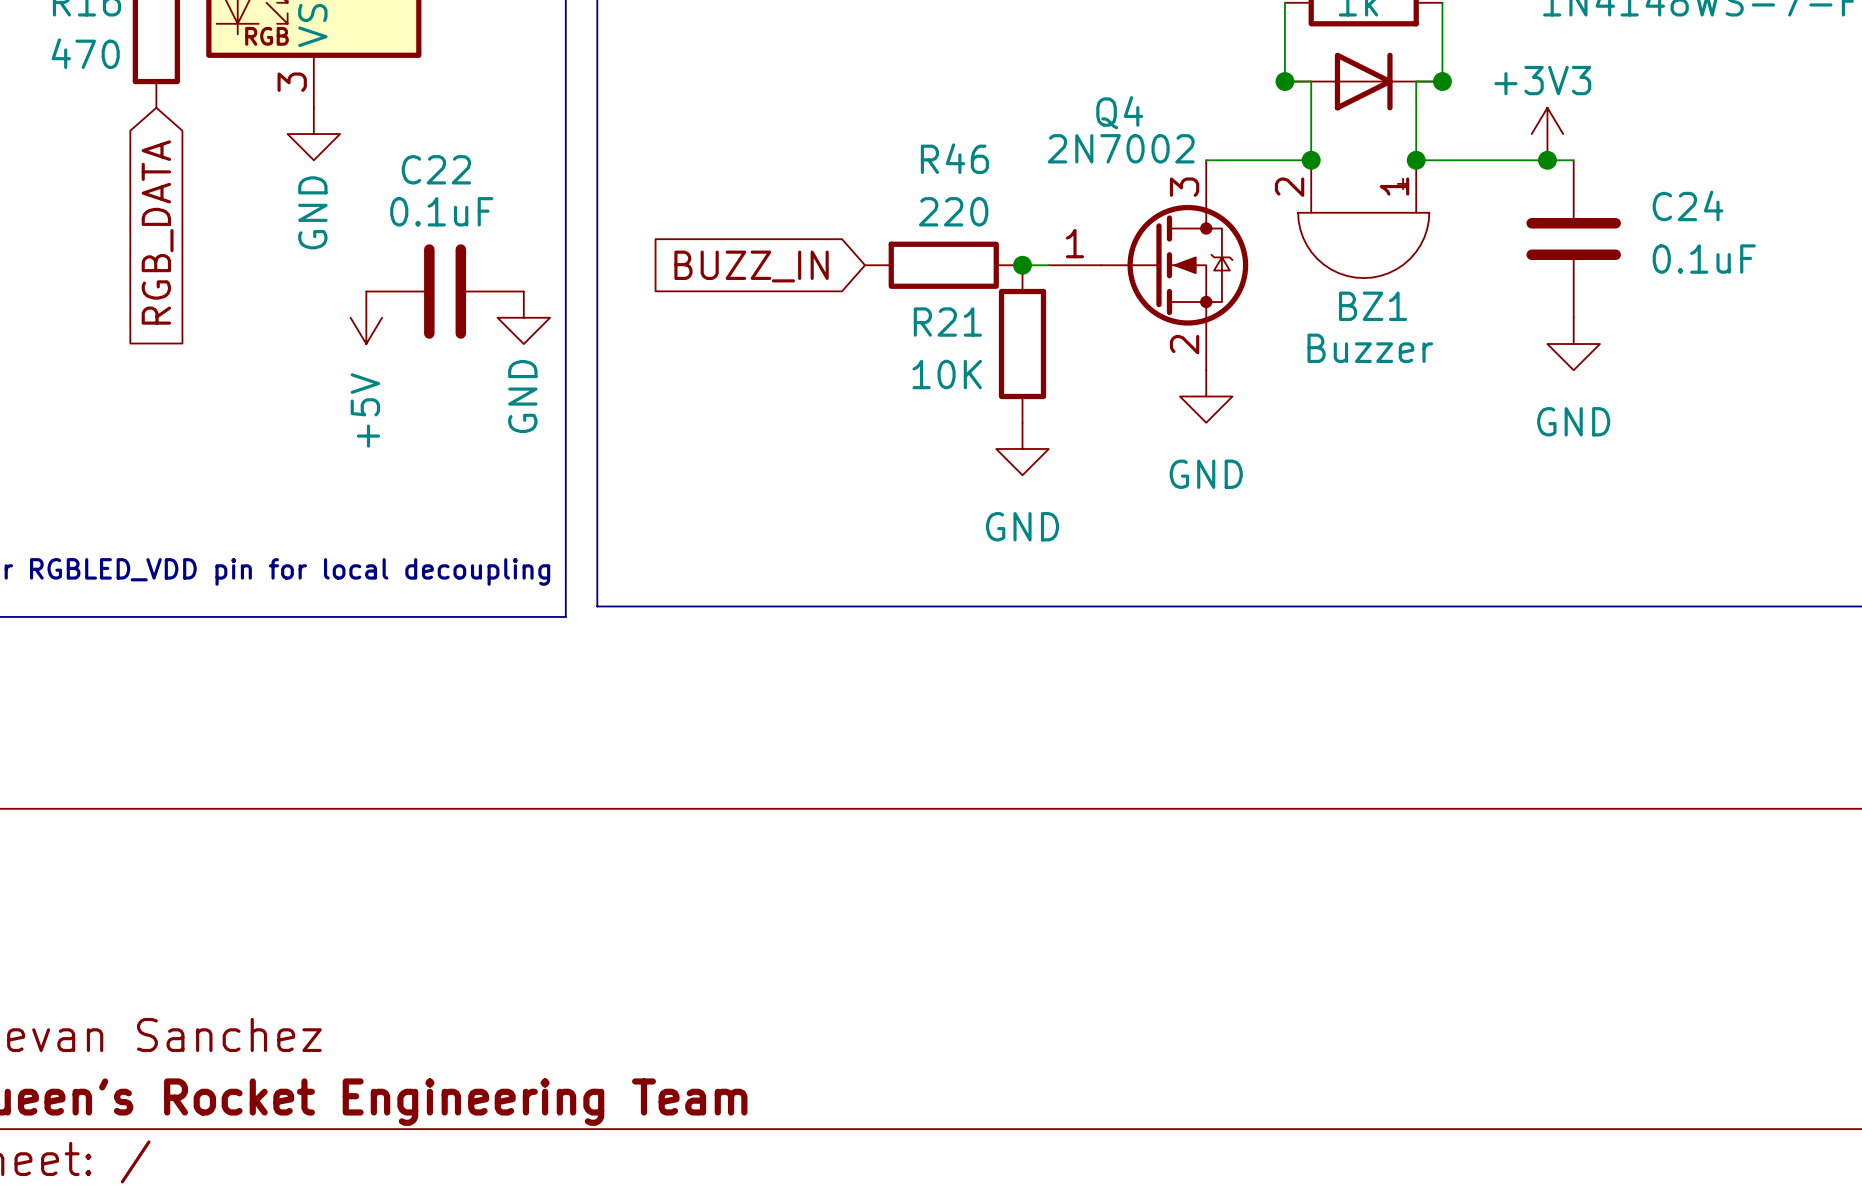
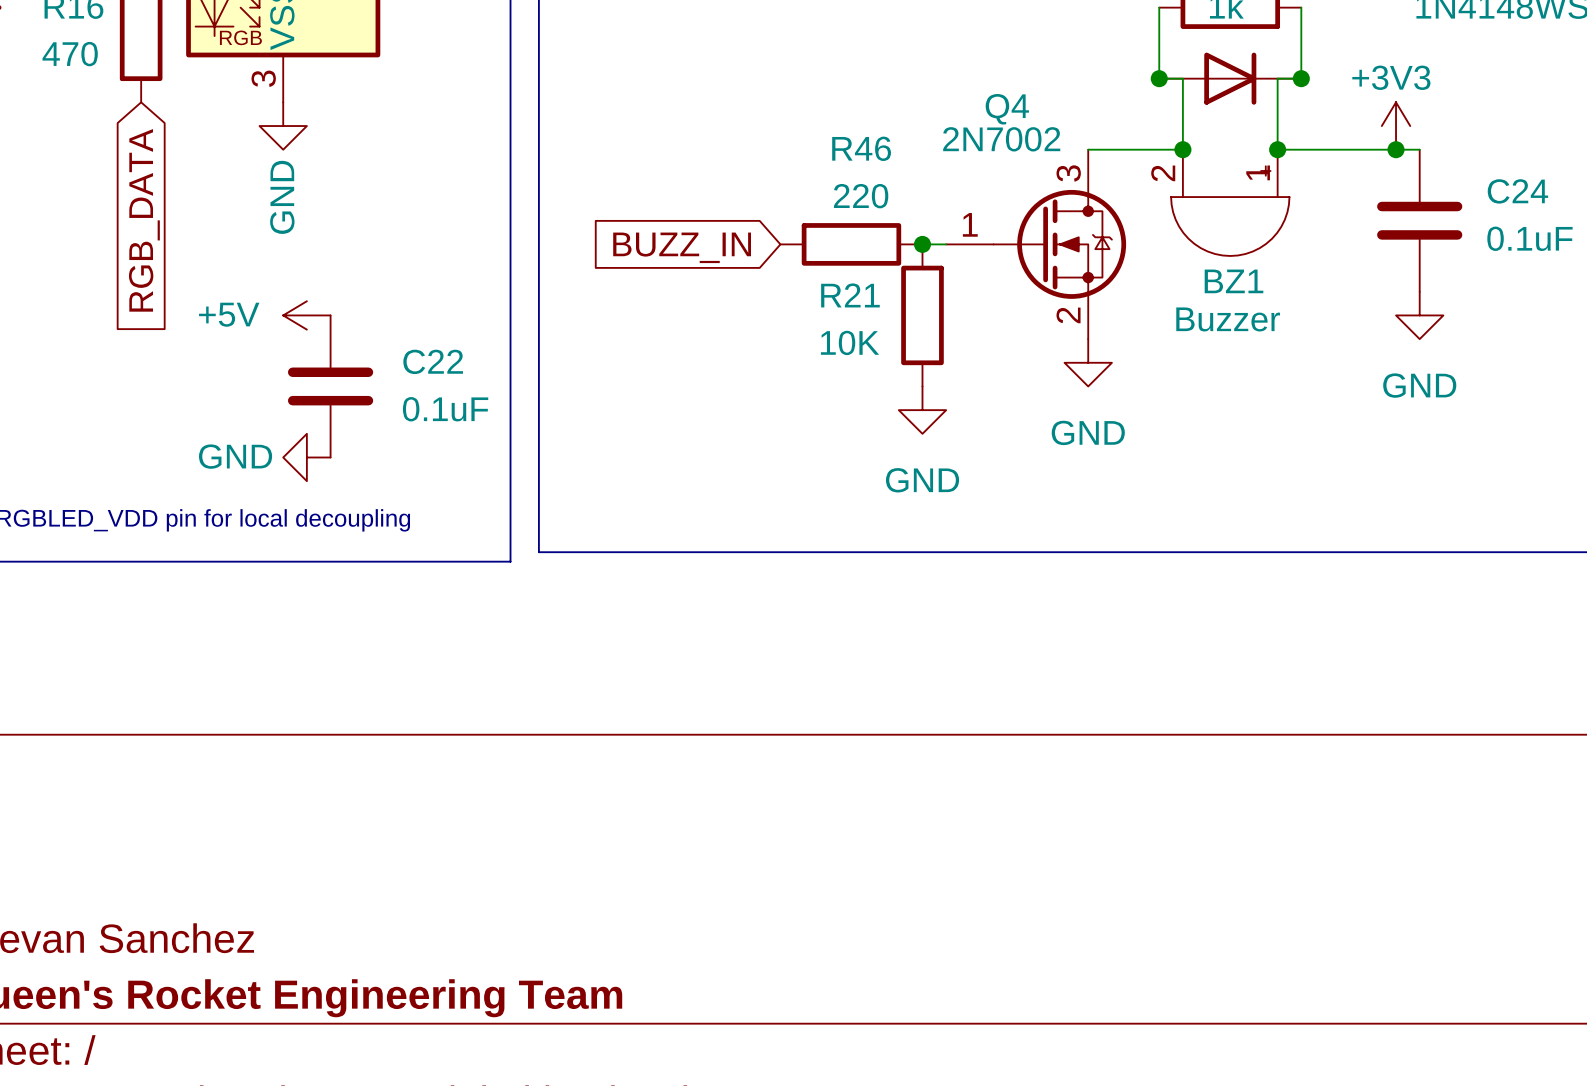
C22 value position: 0.1uF (441, 211) -> 0.1uF (445, 409)
C22 rotation: 0° (445, 291) -> 90° clockwise (330, 386)
C22 position: (445, 291) -> (330, 386)
power symbol rotation: 0° (366, 317) -> 90° clockwise (306, 315)
power symbol position: +5V (366, 317) -> +5V (306, 315)
power symbol rotation: 0° (523, 317) -> 90° clockwise (306, 457)
power symbol position: GND (523, 317) -> GND (306, 457)

